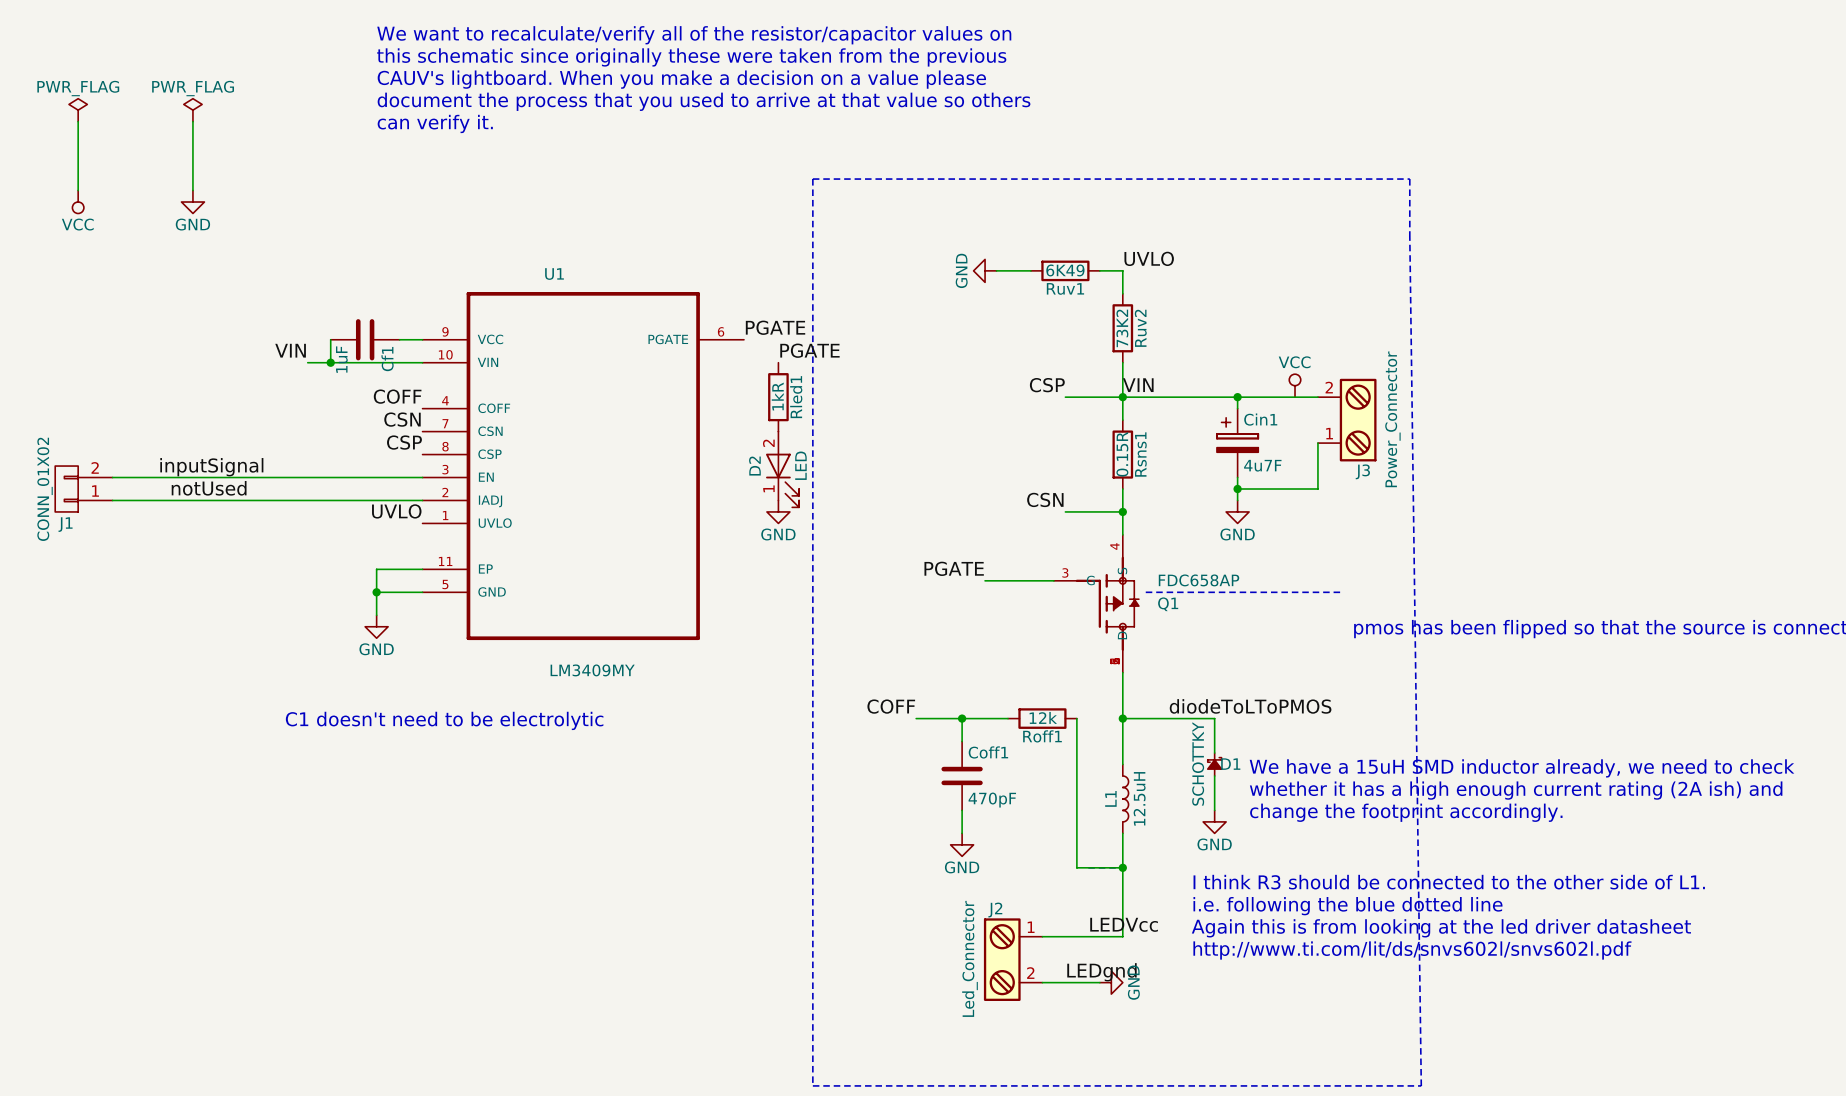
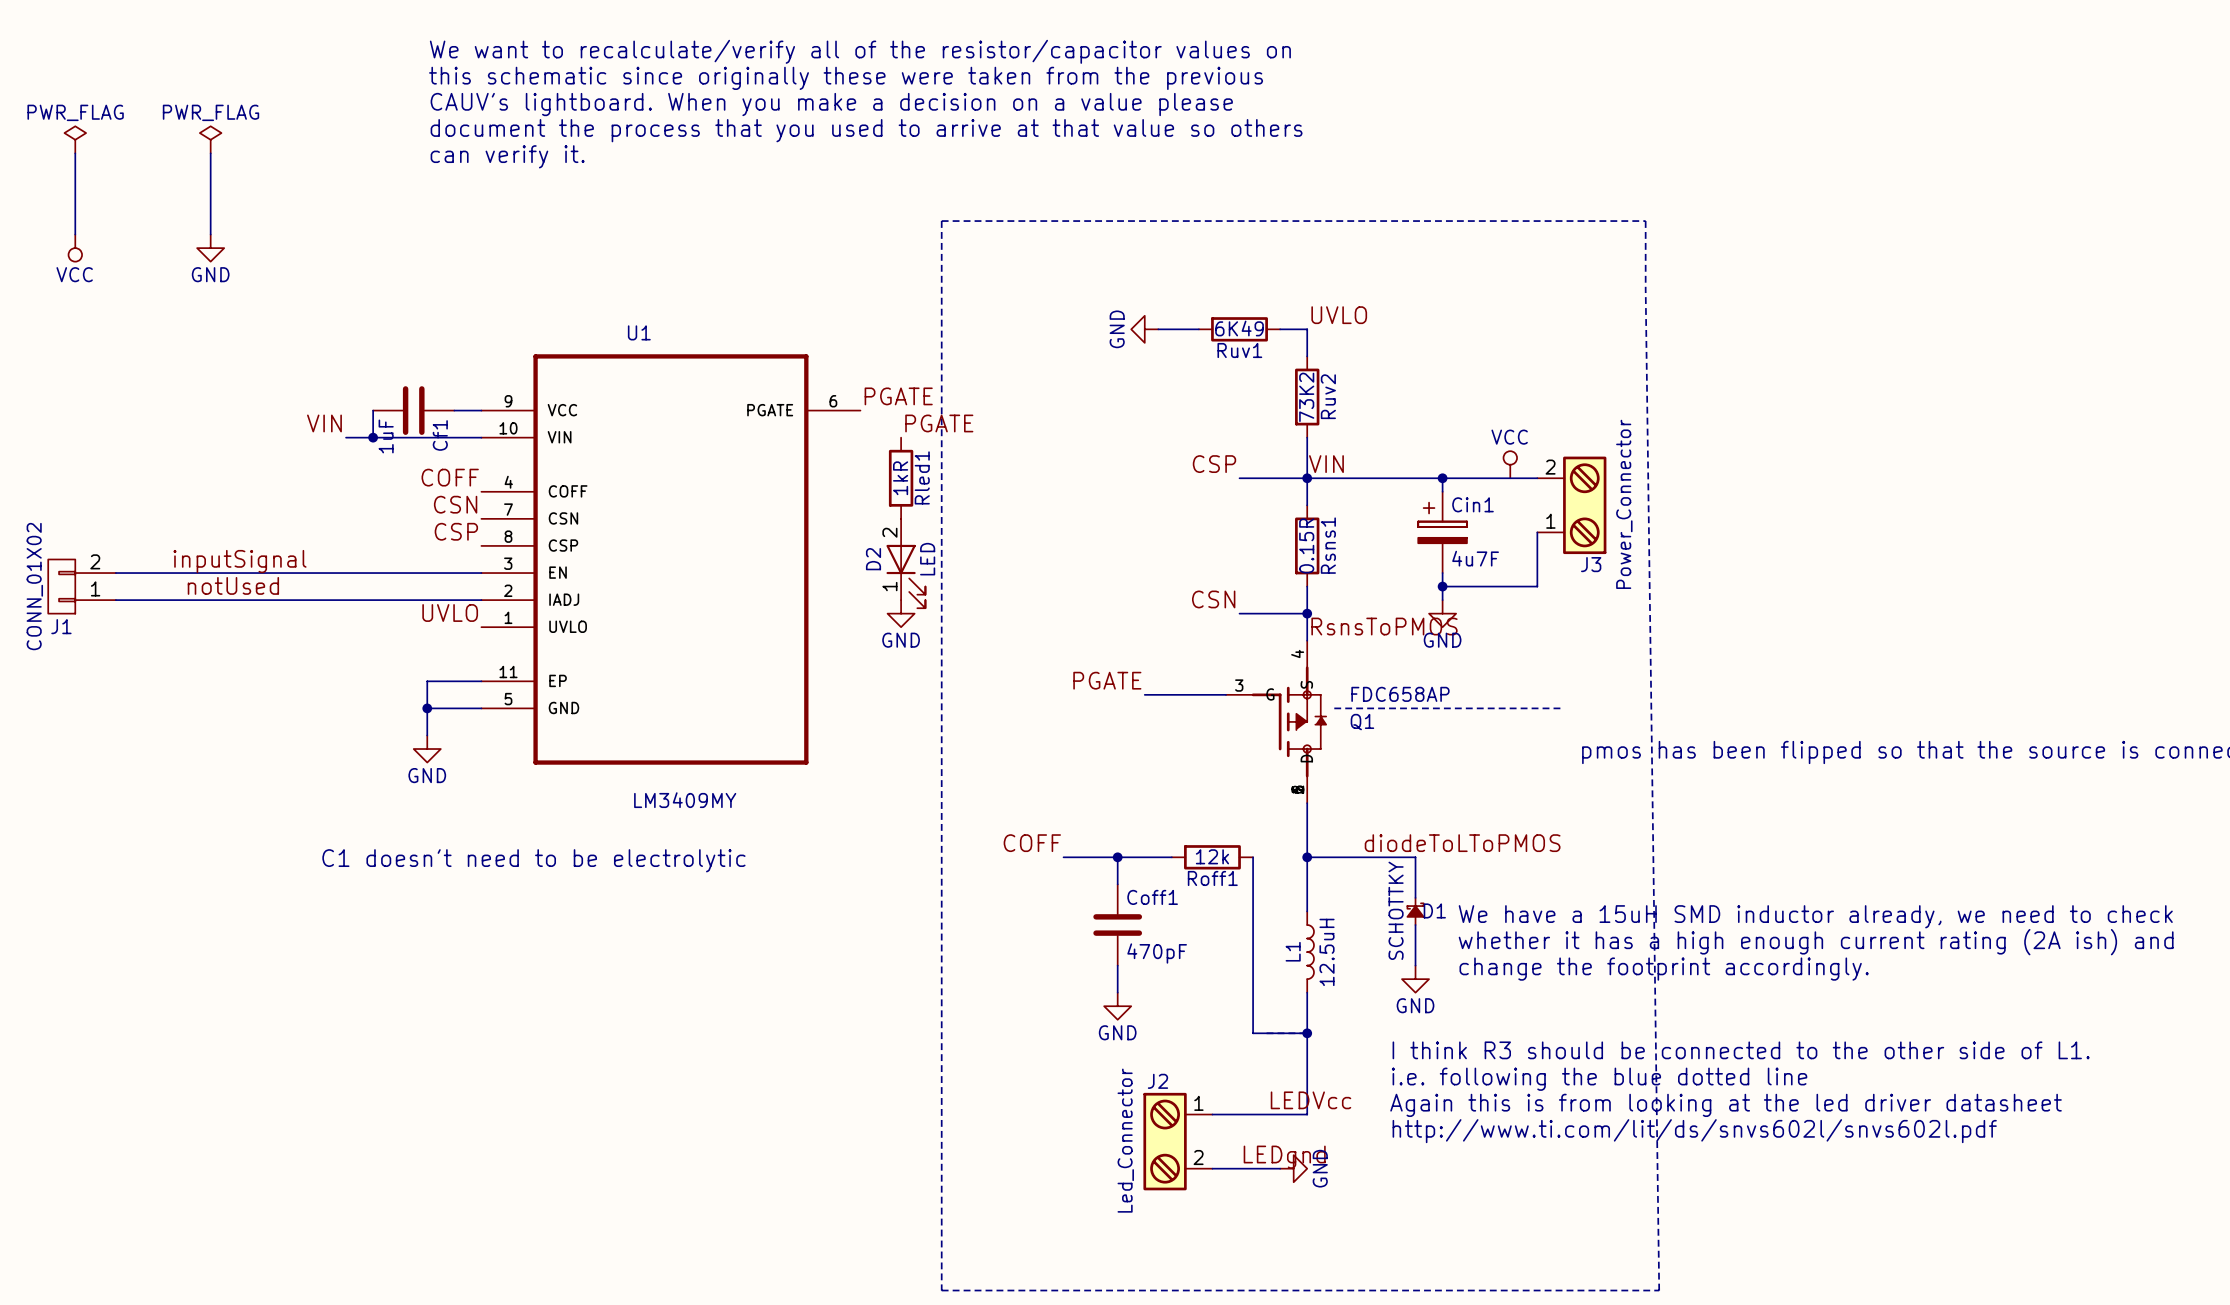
label: none -> RsnsToPMOS (1384, 626)

